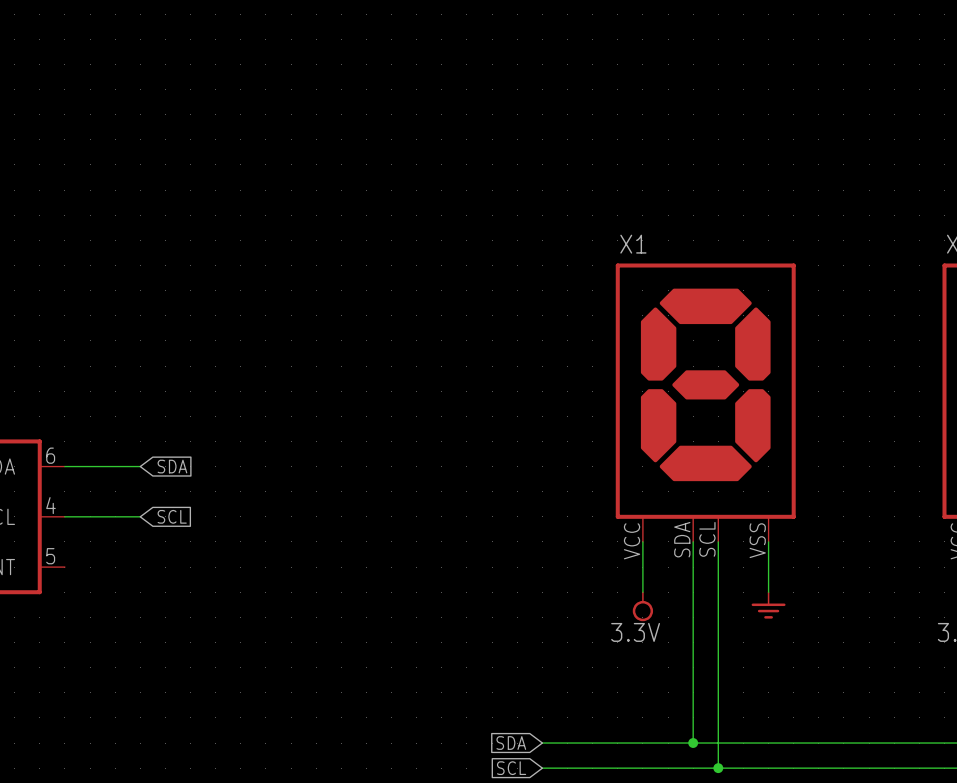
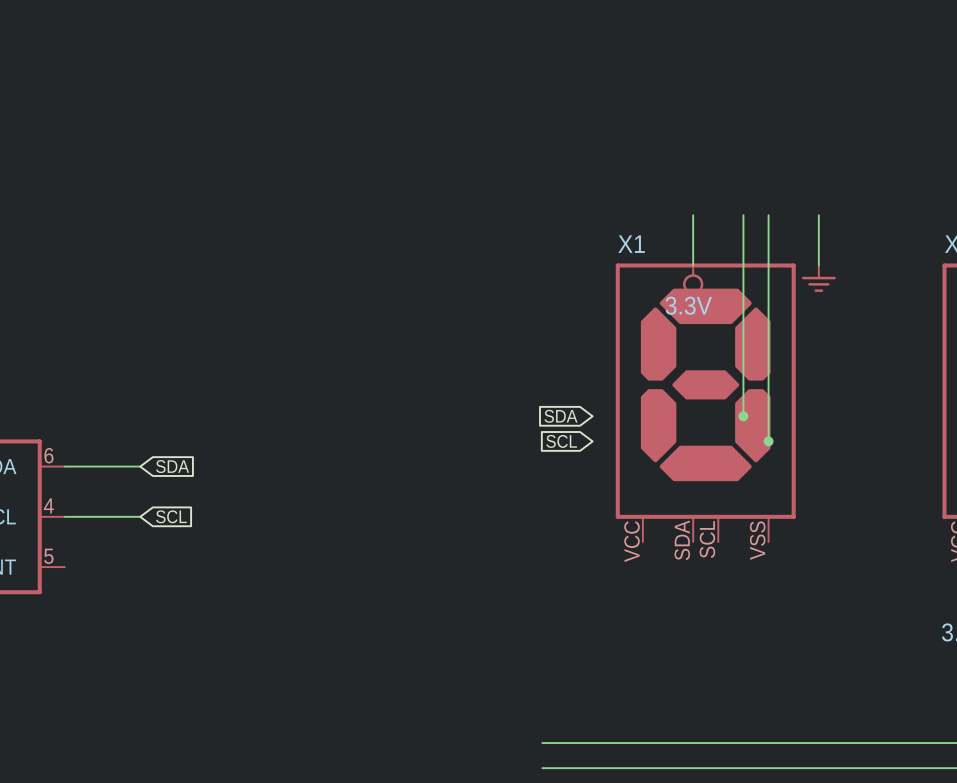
wire: none -> (693, 215) (693, 265)
wire: none -> (743, 215) (743, 416)
wire: none -> (768, 215) (768, 441)
wire: none -> (818, 215) (818, 265)
power symbol: none -> (818, 278)
power symbol: none -> 3.3V (693, 279)
global label: none -> SDA (561, 416)
junction: none -> (743, 416)
global label: none -> SCL (561, 441)
junction: none -> (768, 441)
wire: (642, 541) (642, 592) -> none
wire: (693, 541) (693, 743) -> none
wire: (718, 541) (718, 768) -> none
wire: (768, 541) (768, 592) -> none
power symbol: (768, 605) -> none
power symbol: 3.3V (642, 606) -> none
global label: SDA (511, 743) -> none
junction: (693, 743) -> none
global label: SCL (511, 768) -> none
junction: (718, 768) -> none

